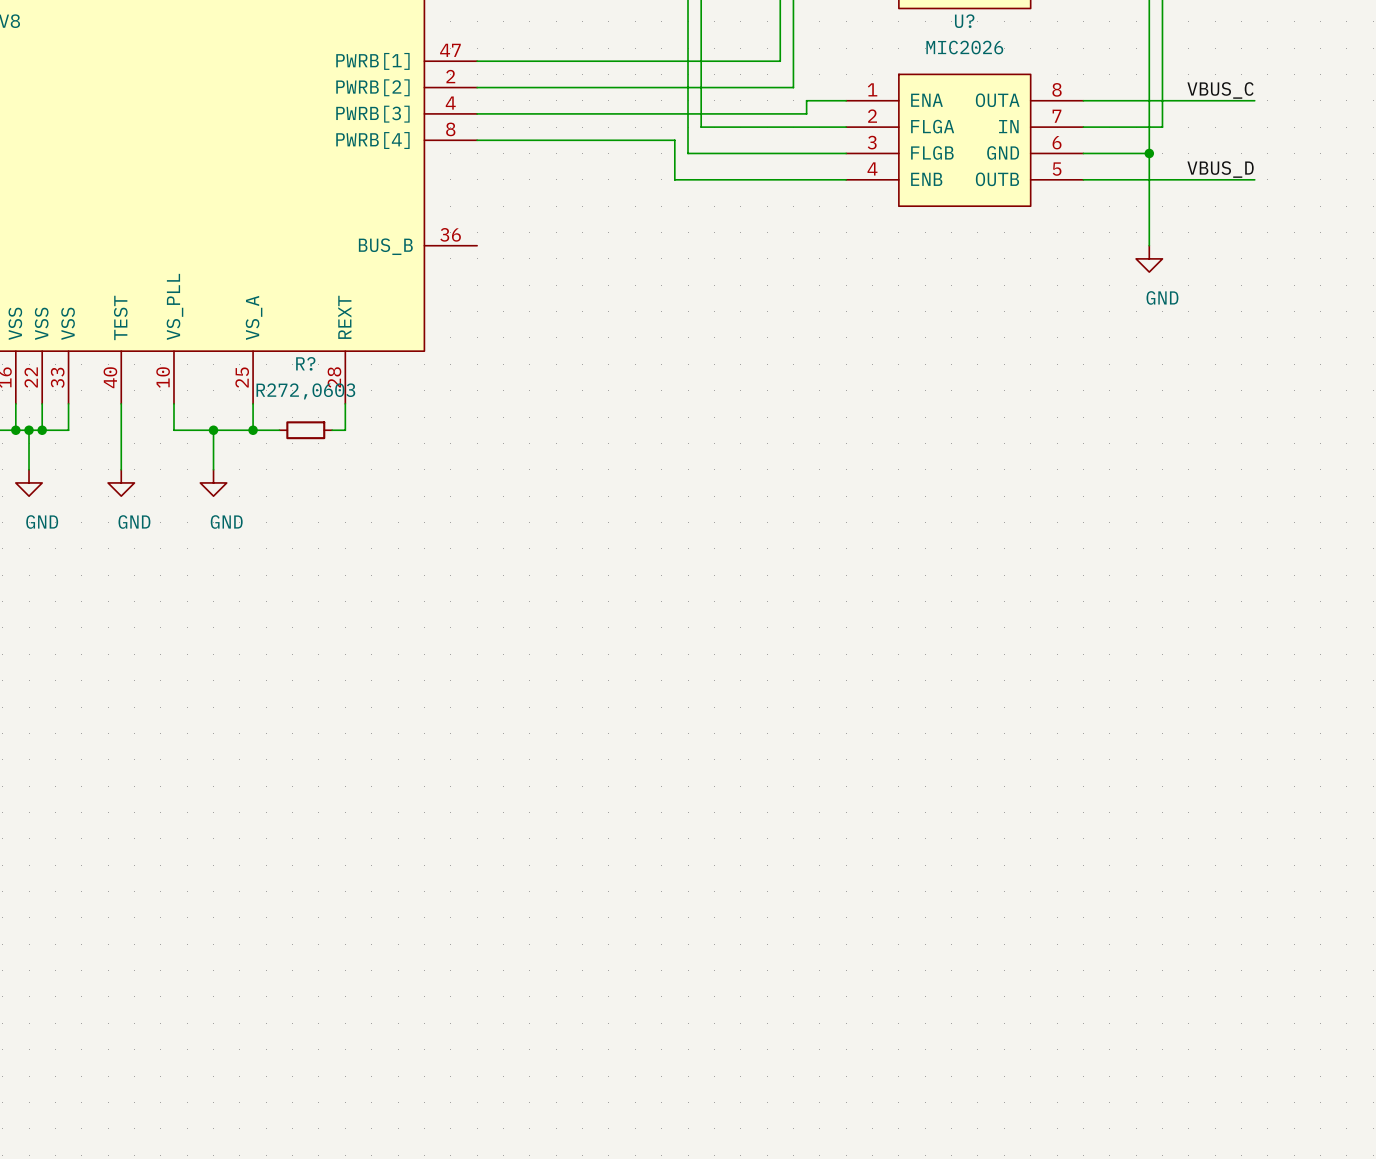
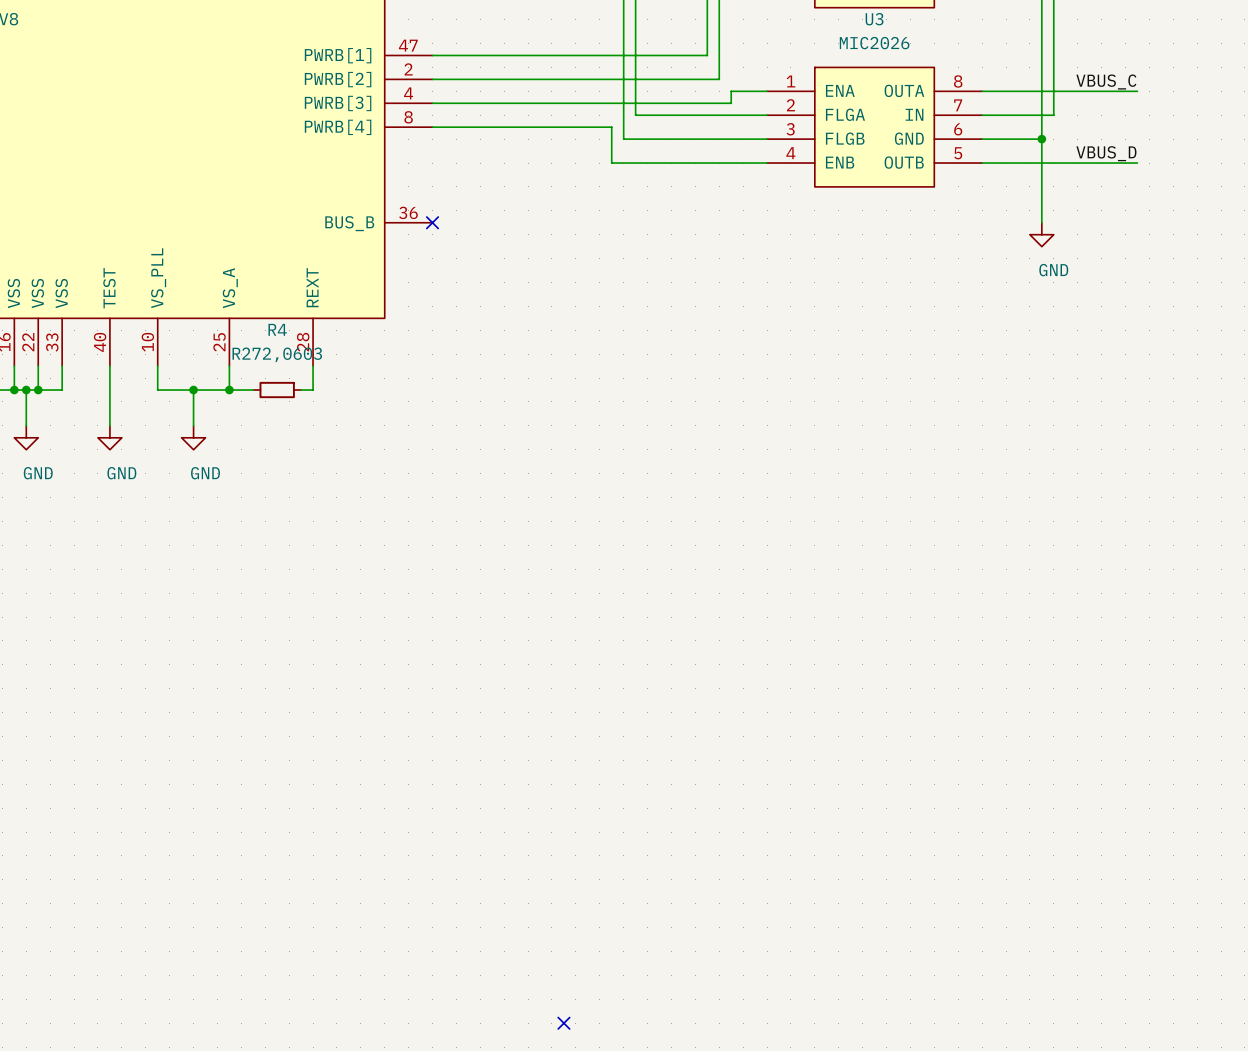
U? name: U? (964, 21) -> U3 (874, 19)
no-connect mark: none -> (432, 222)
R? name: R? (305, 363) -> R4 (277, 329)
no-connect mark: none -> (563, 1023)

